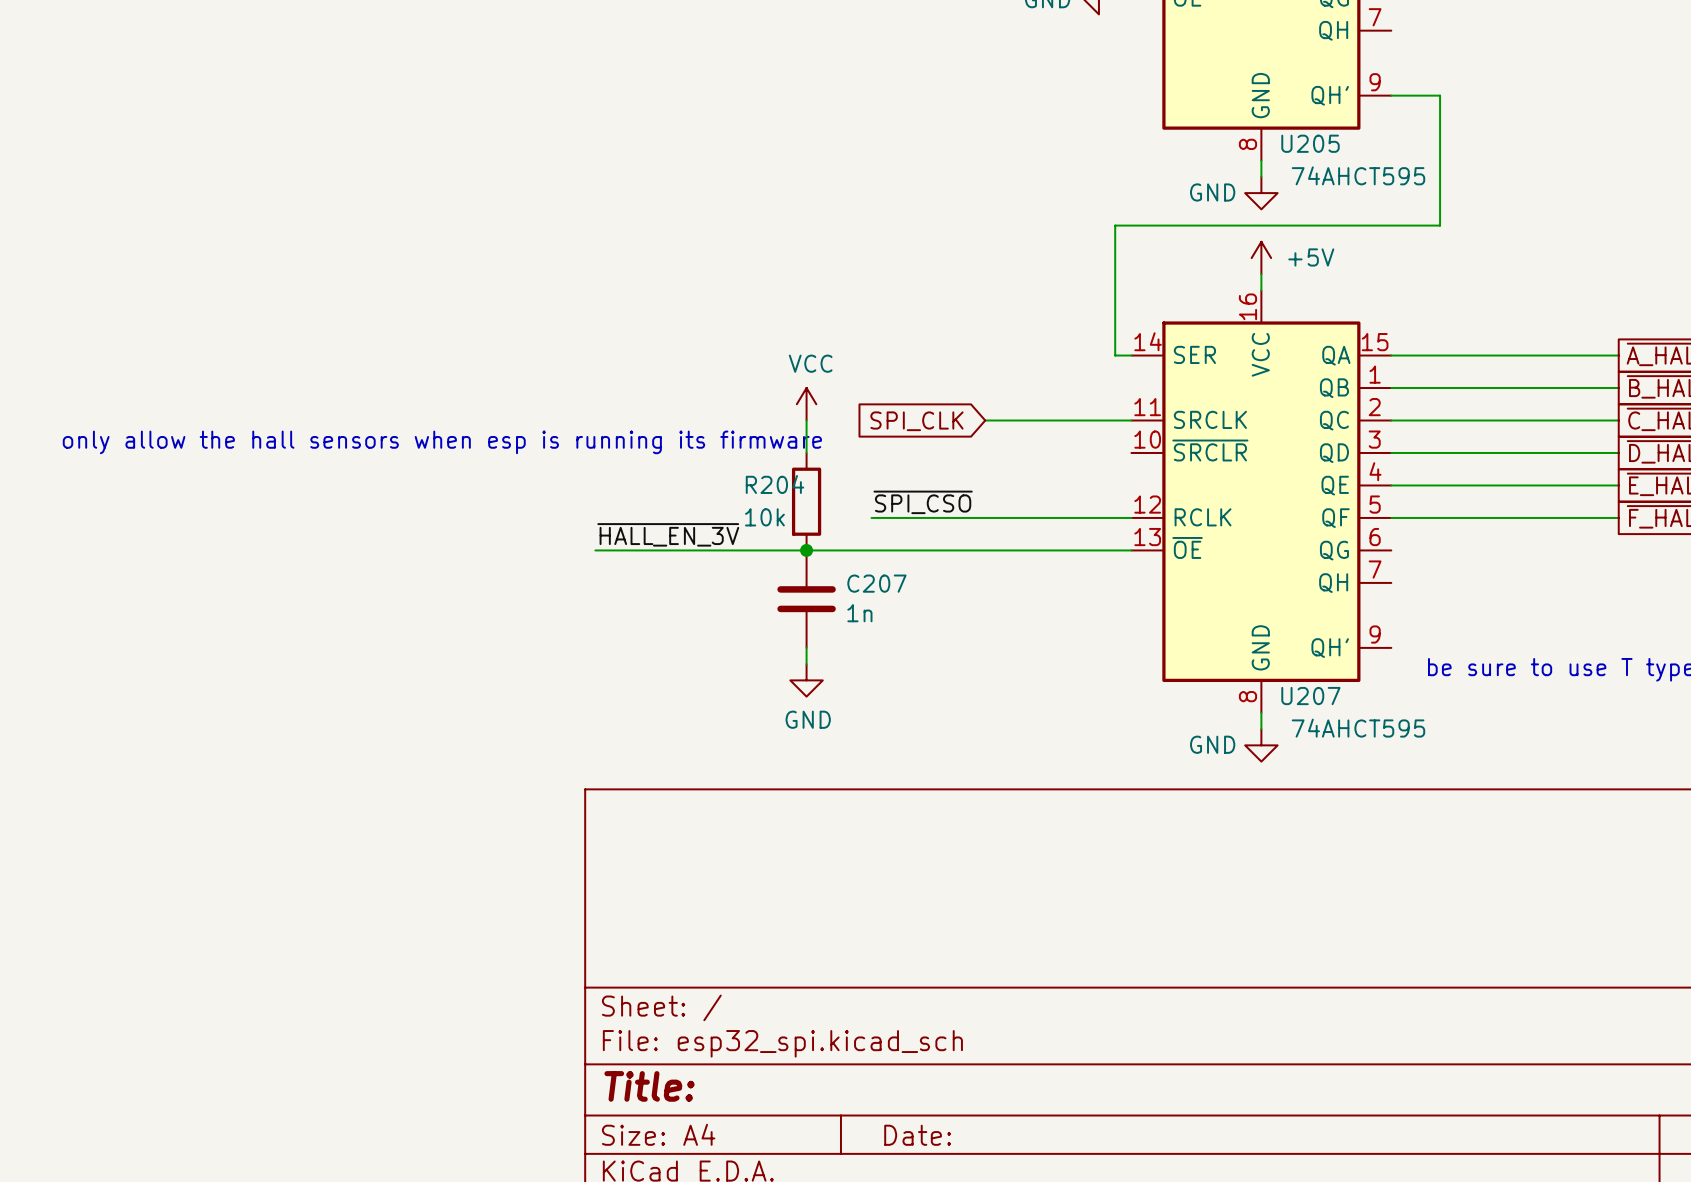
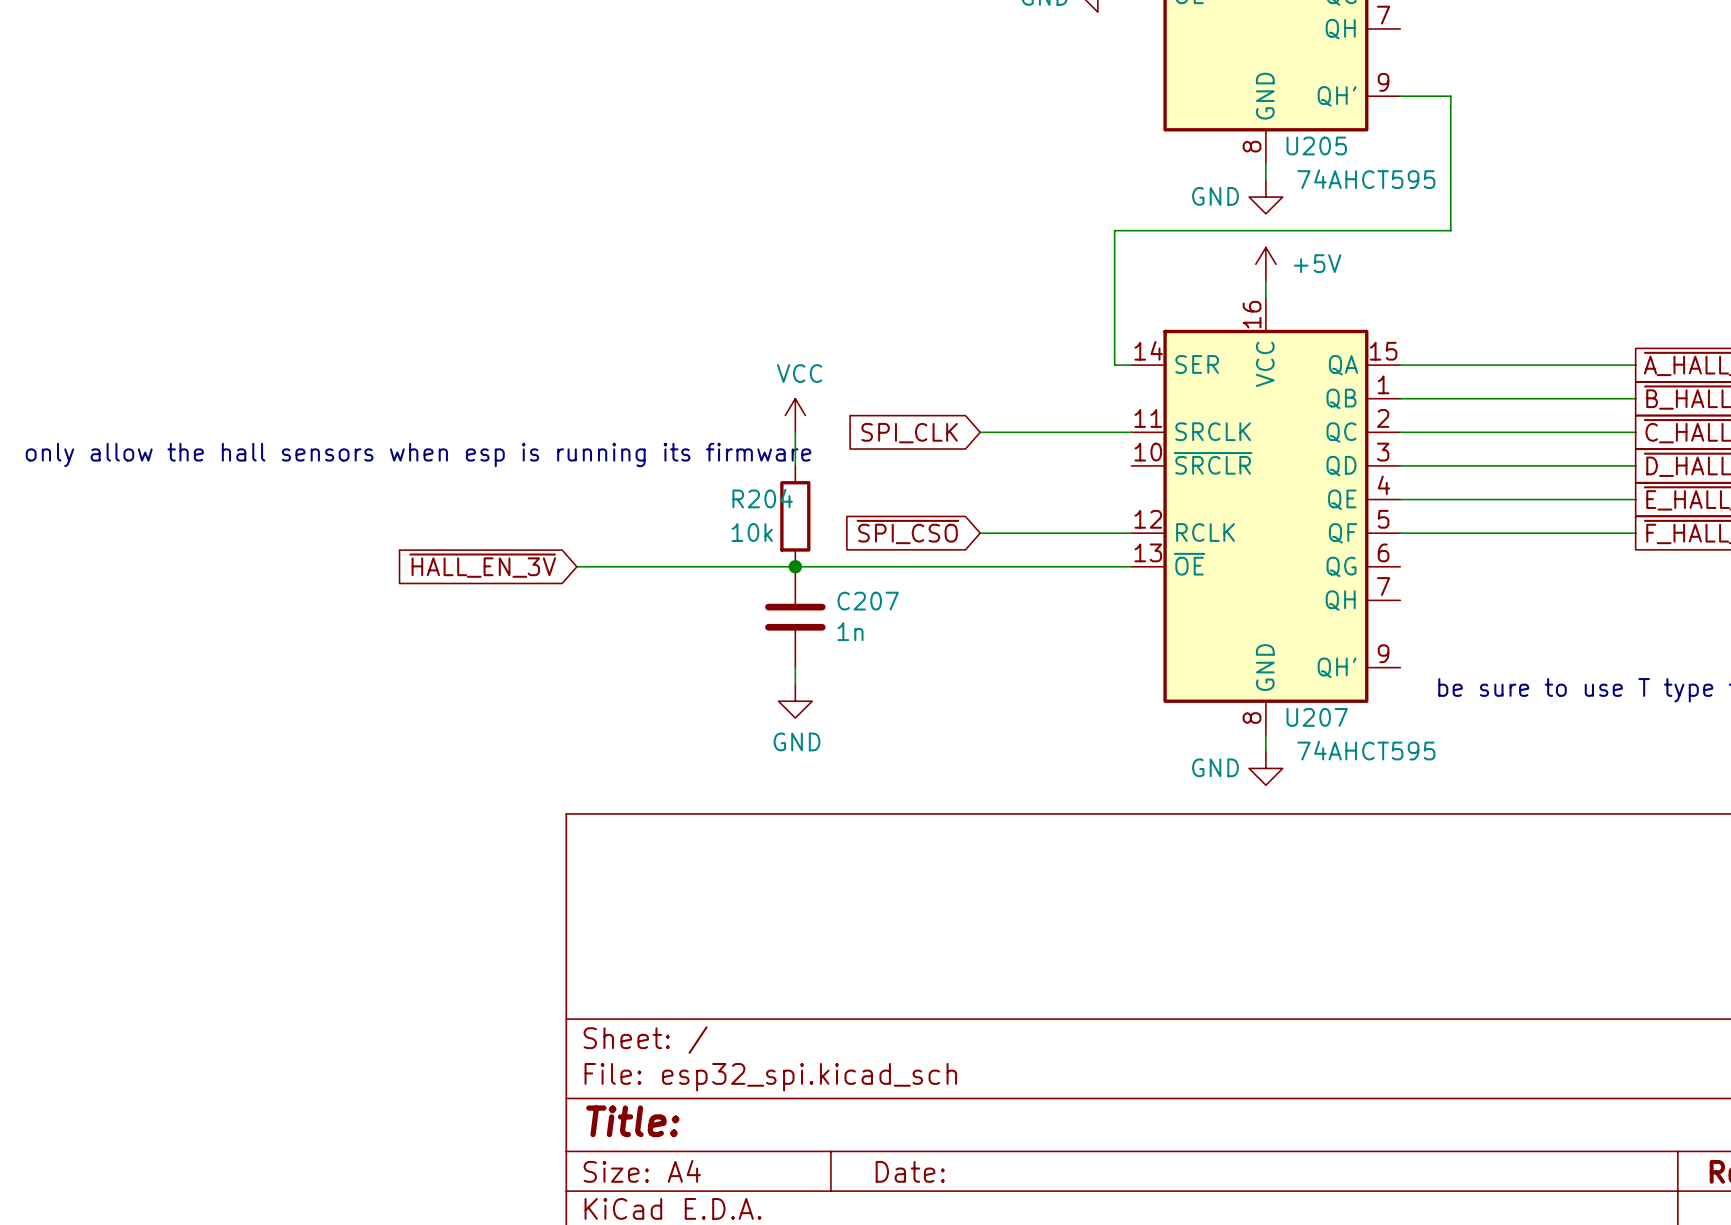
label: ~{SPI_CSO} (923, 502) -> none
global label: none -> ~{SPI_CSO} (907, 532)
wire: (871, 517) (985, 517) -> none
label: ~{HALL_EN_3V} (668, 534) -> none
global label: none -> ~{HALL_EN_3V} (482, 565)

